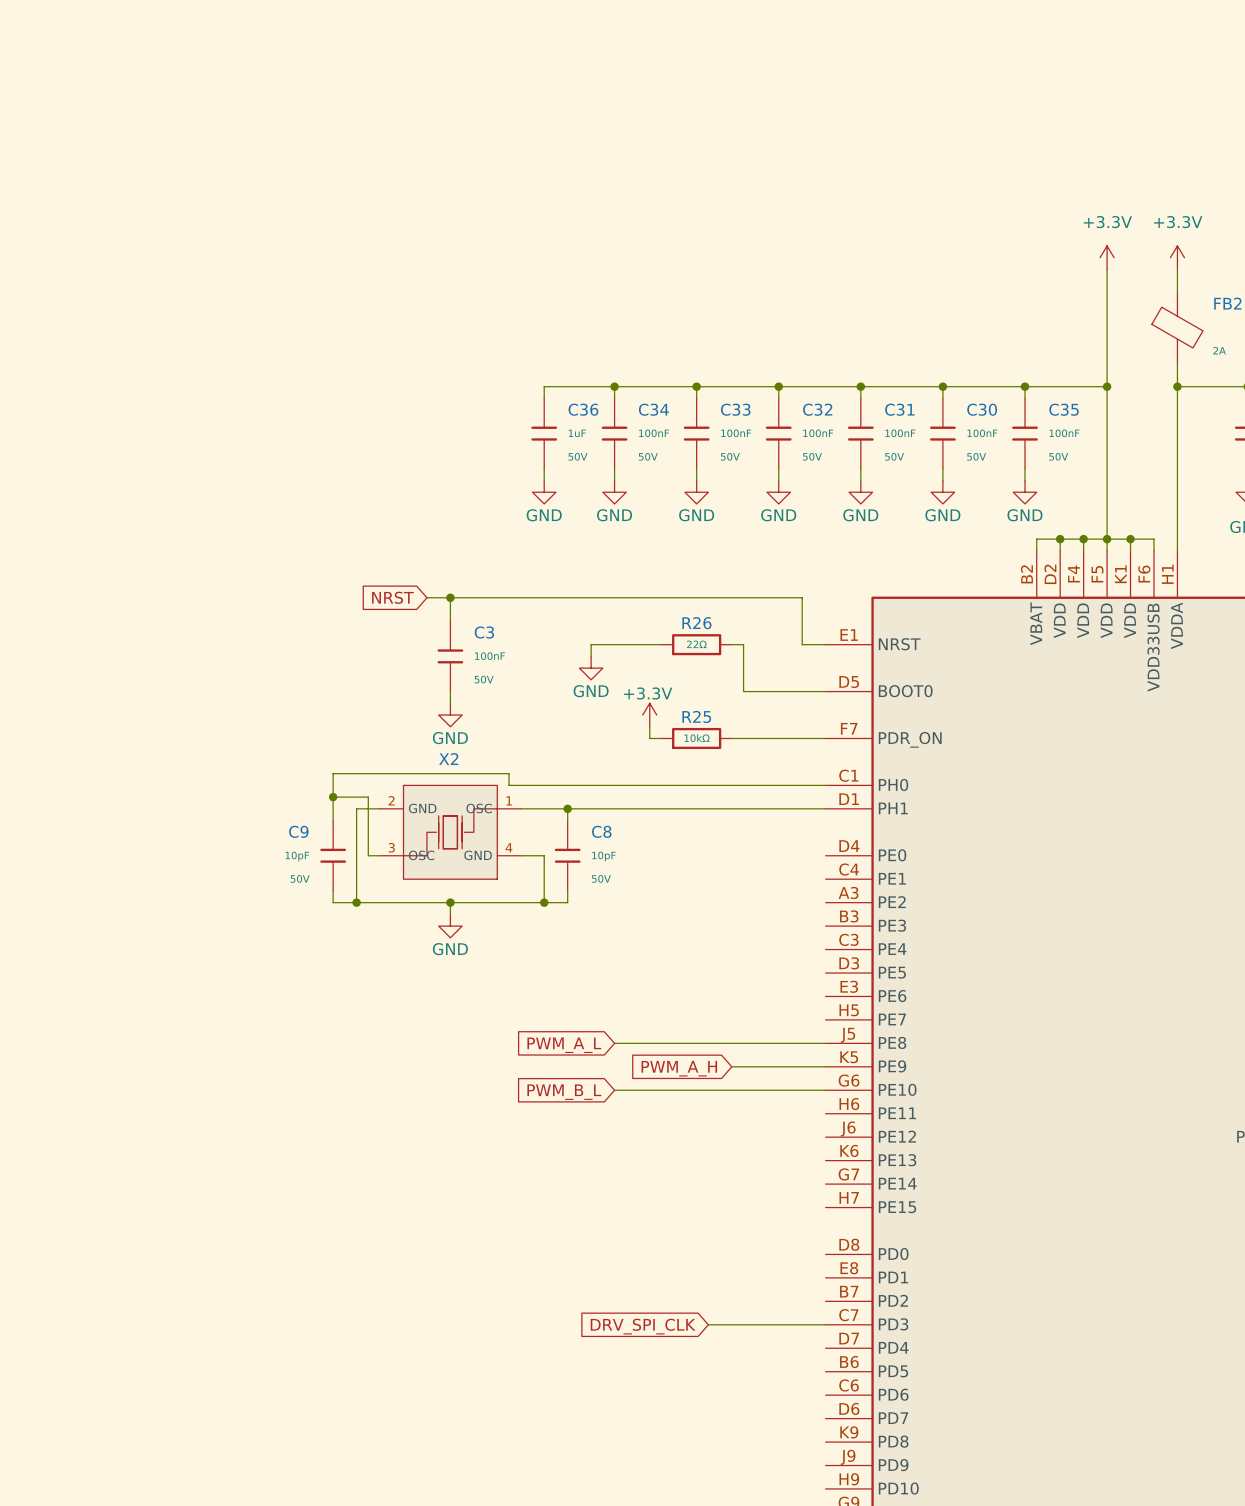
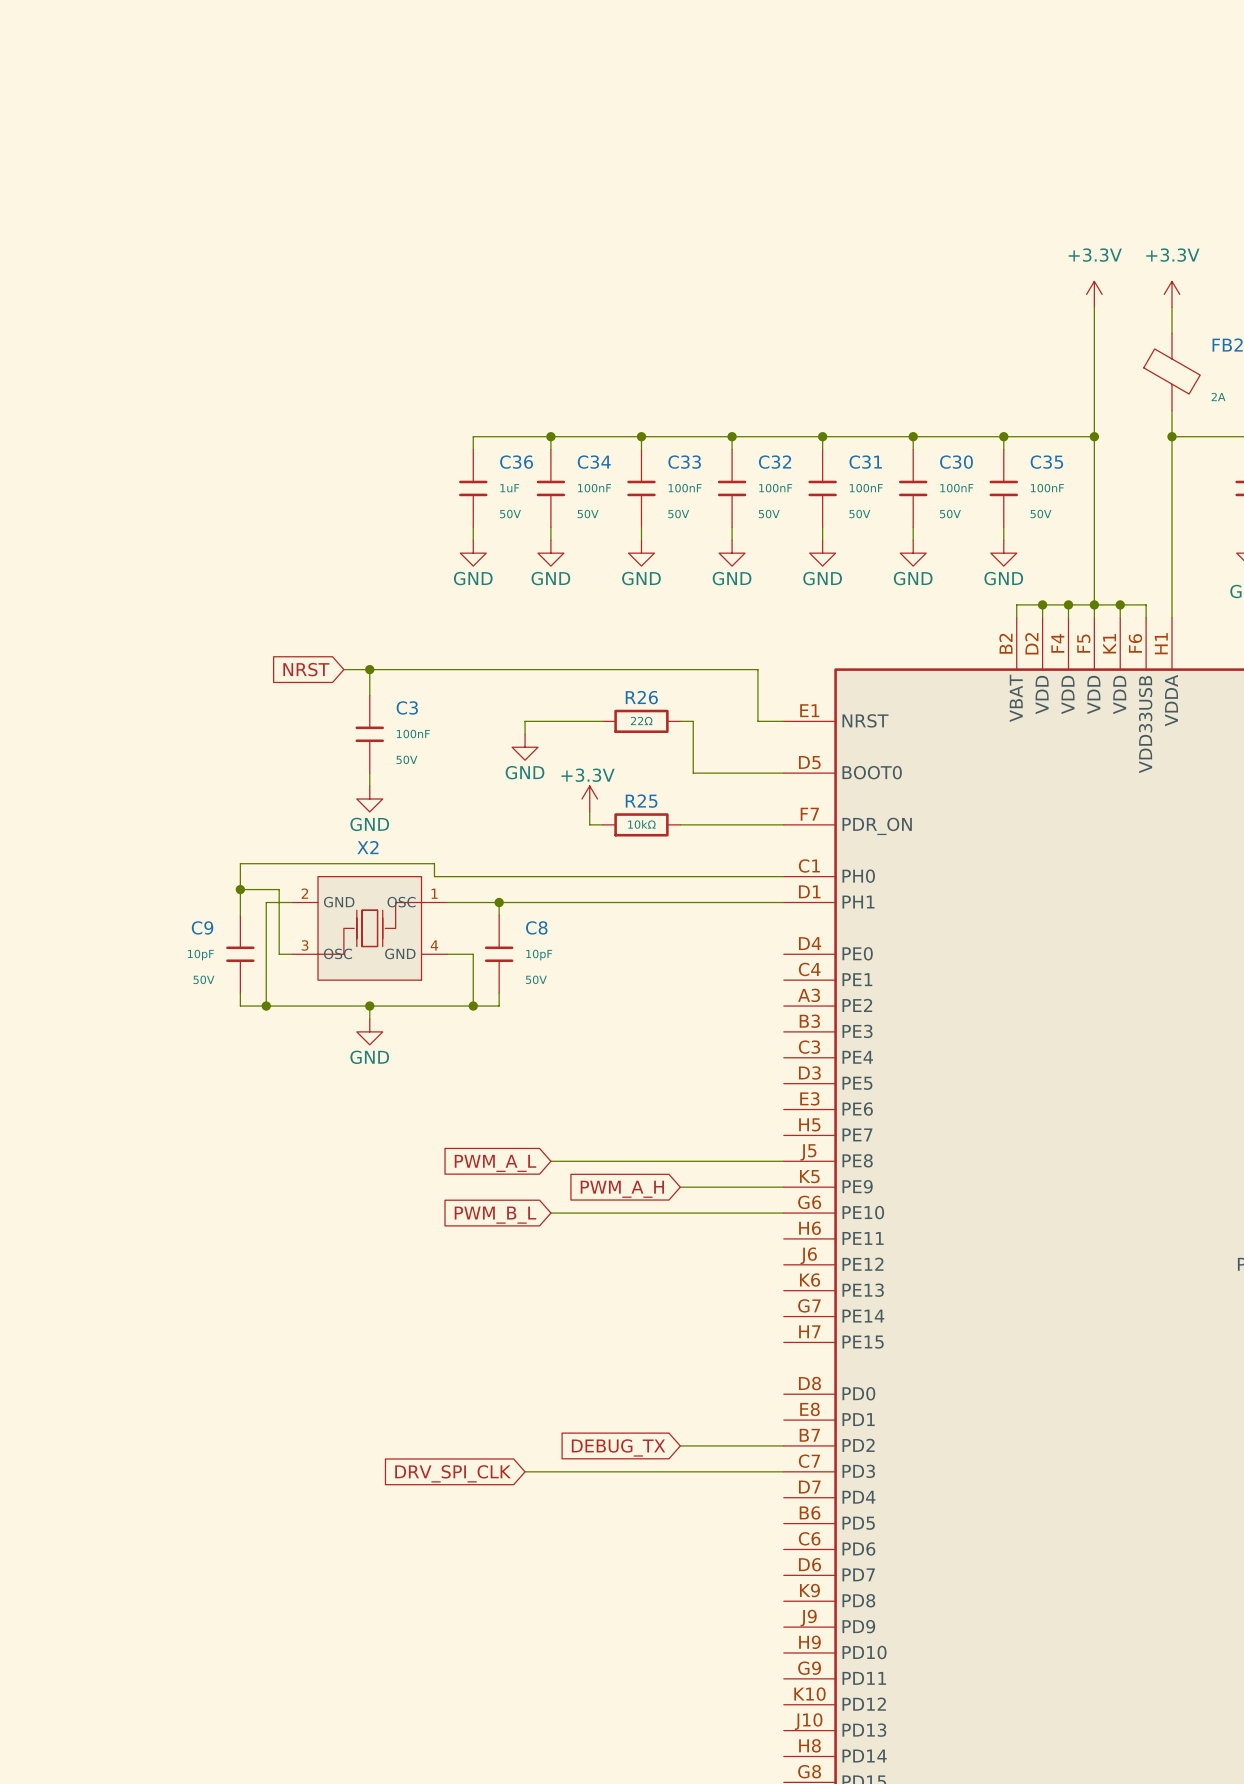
wire: none -> (680, 1445) (783, 1445)
global label: none -> DEBUG_TX (618, 1447)
wire: none -> (525, 1471) (654, 1471)
global label position: DRV_SPI_CLK (643, 1326) -> DRV_SPI_CLK (453, 1473)

